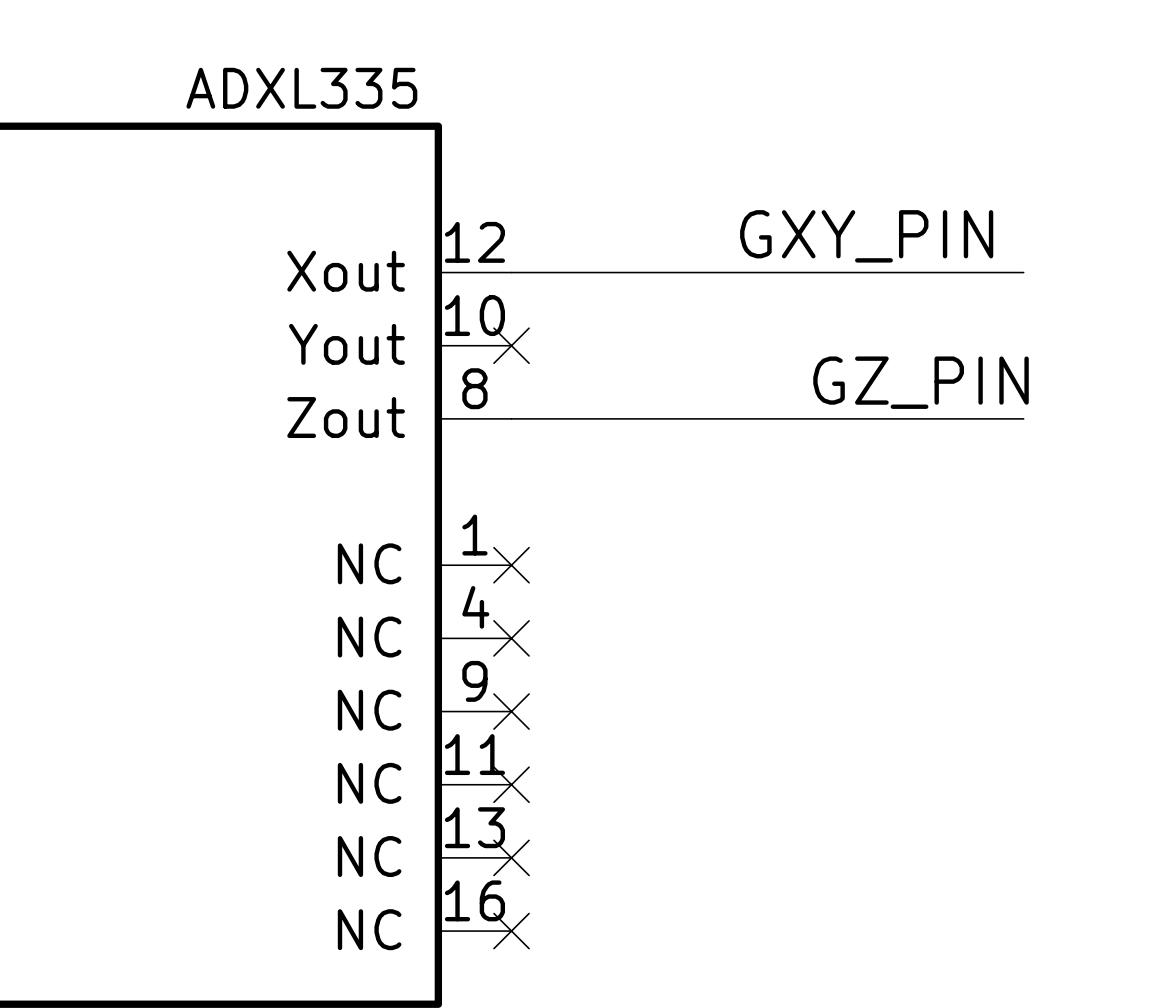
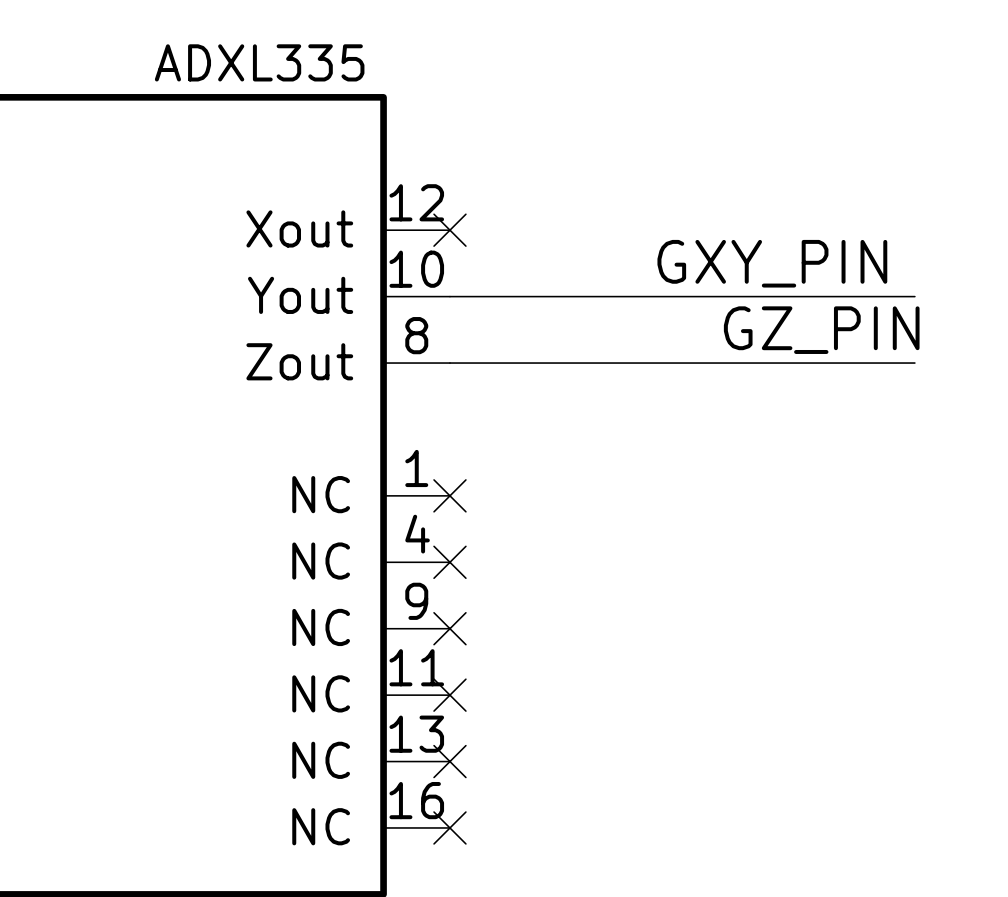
label position: GXY_PIN (866, 236) -> GXY_PIN (772, 263)
wire: (511, 272) (1023, 272) -> (449, 296) (914, 296)
no-connect mark position: (511, 345) -> (449, 230)

